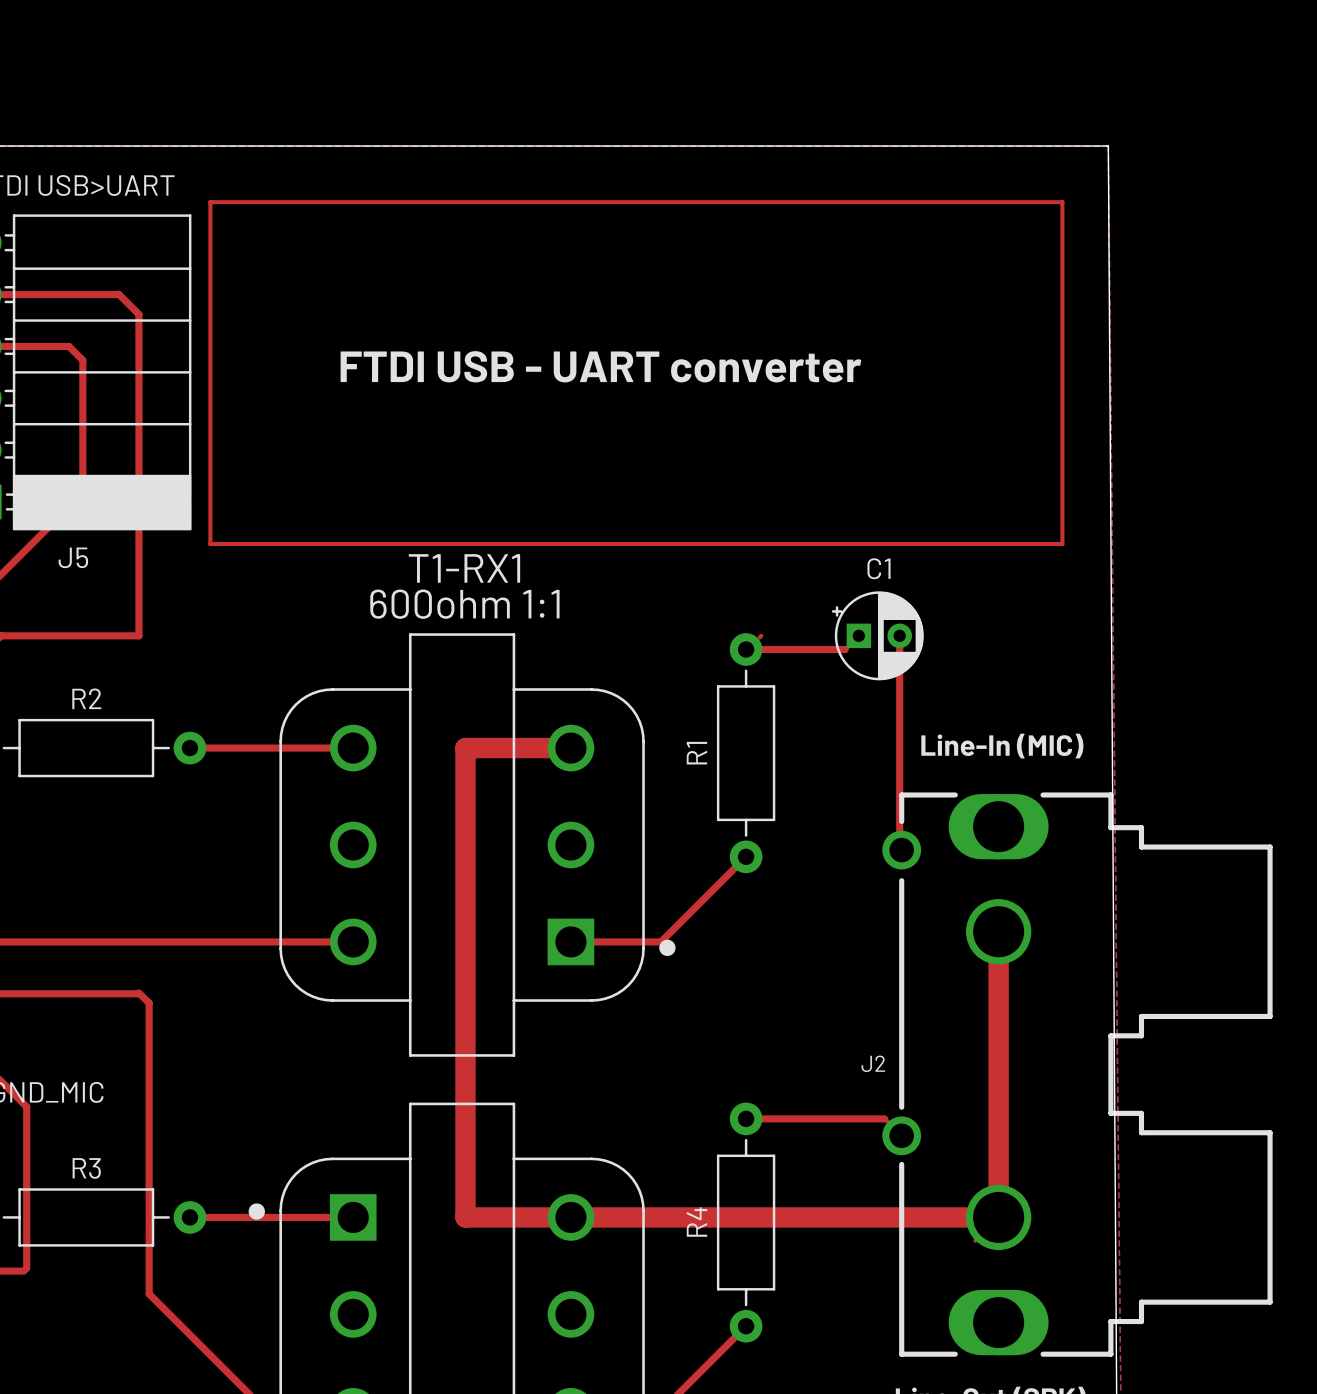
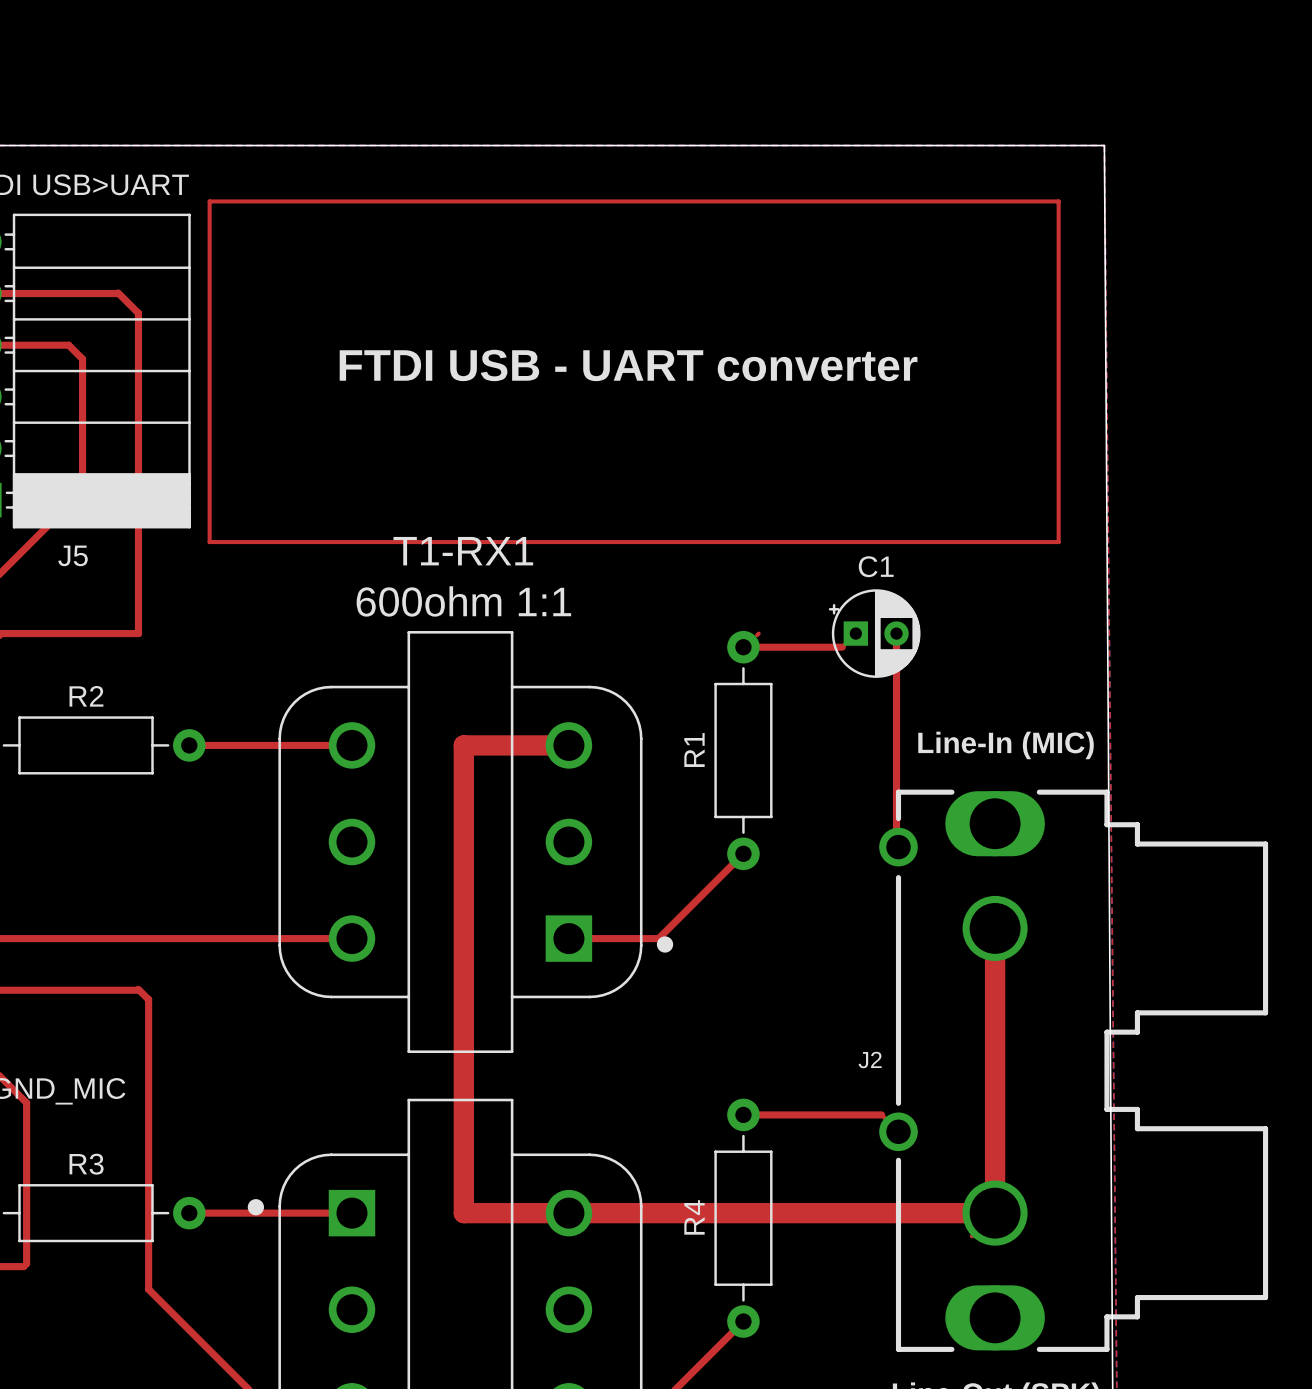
T1-RX1 name position: T1-RX1 (464, 568) -> T1-RX1 (463, 551)

